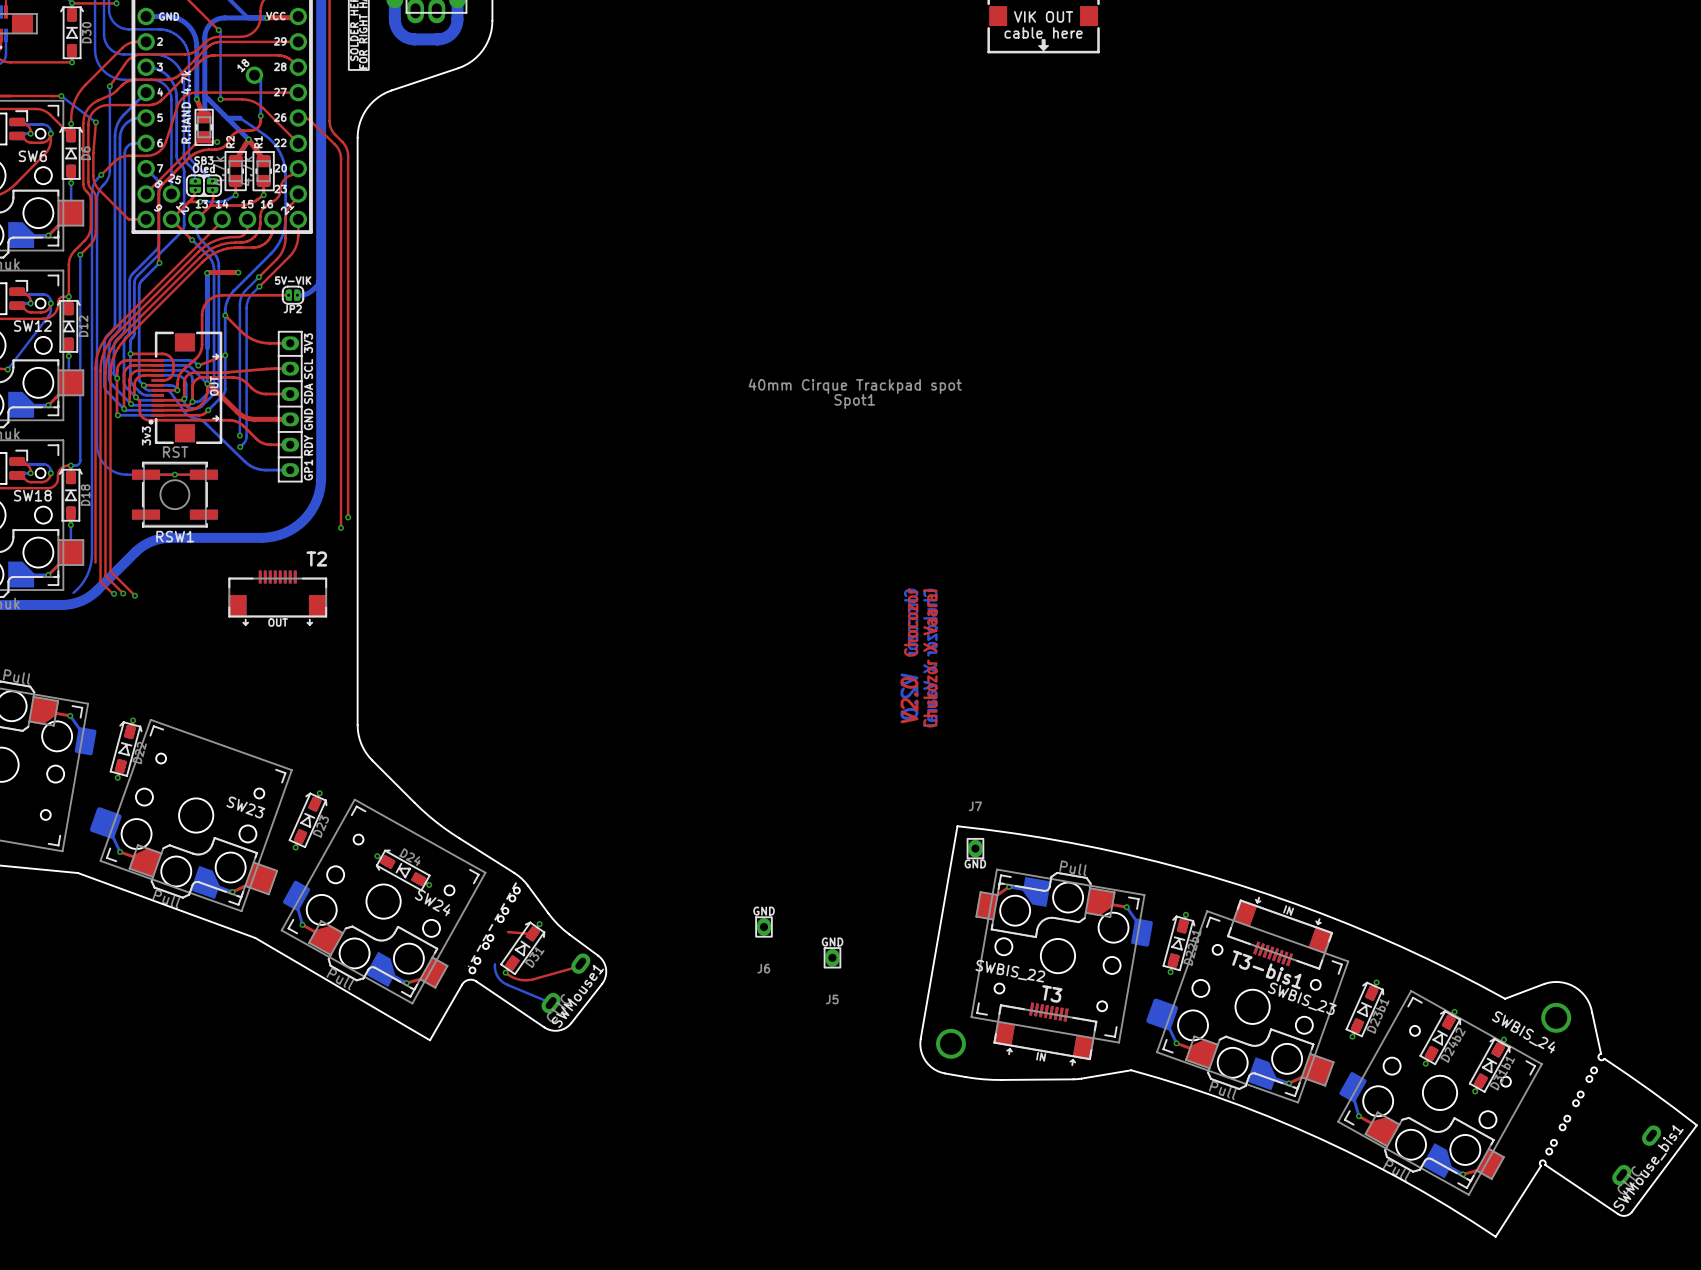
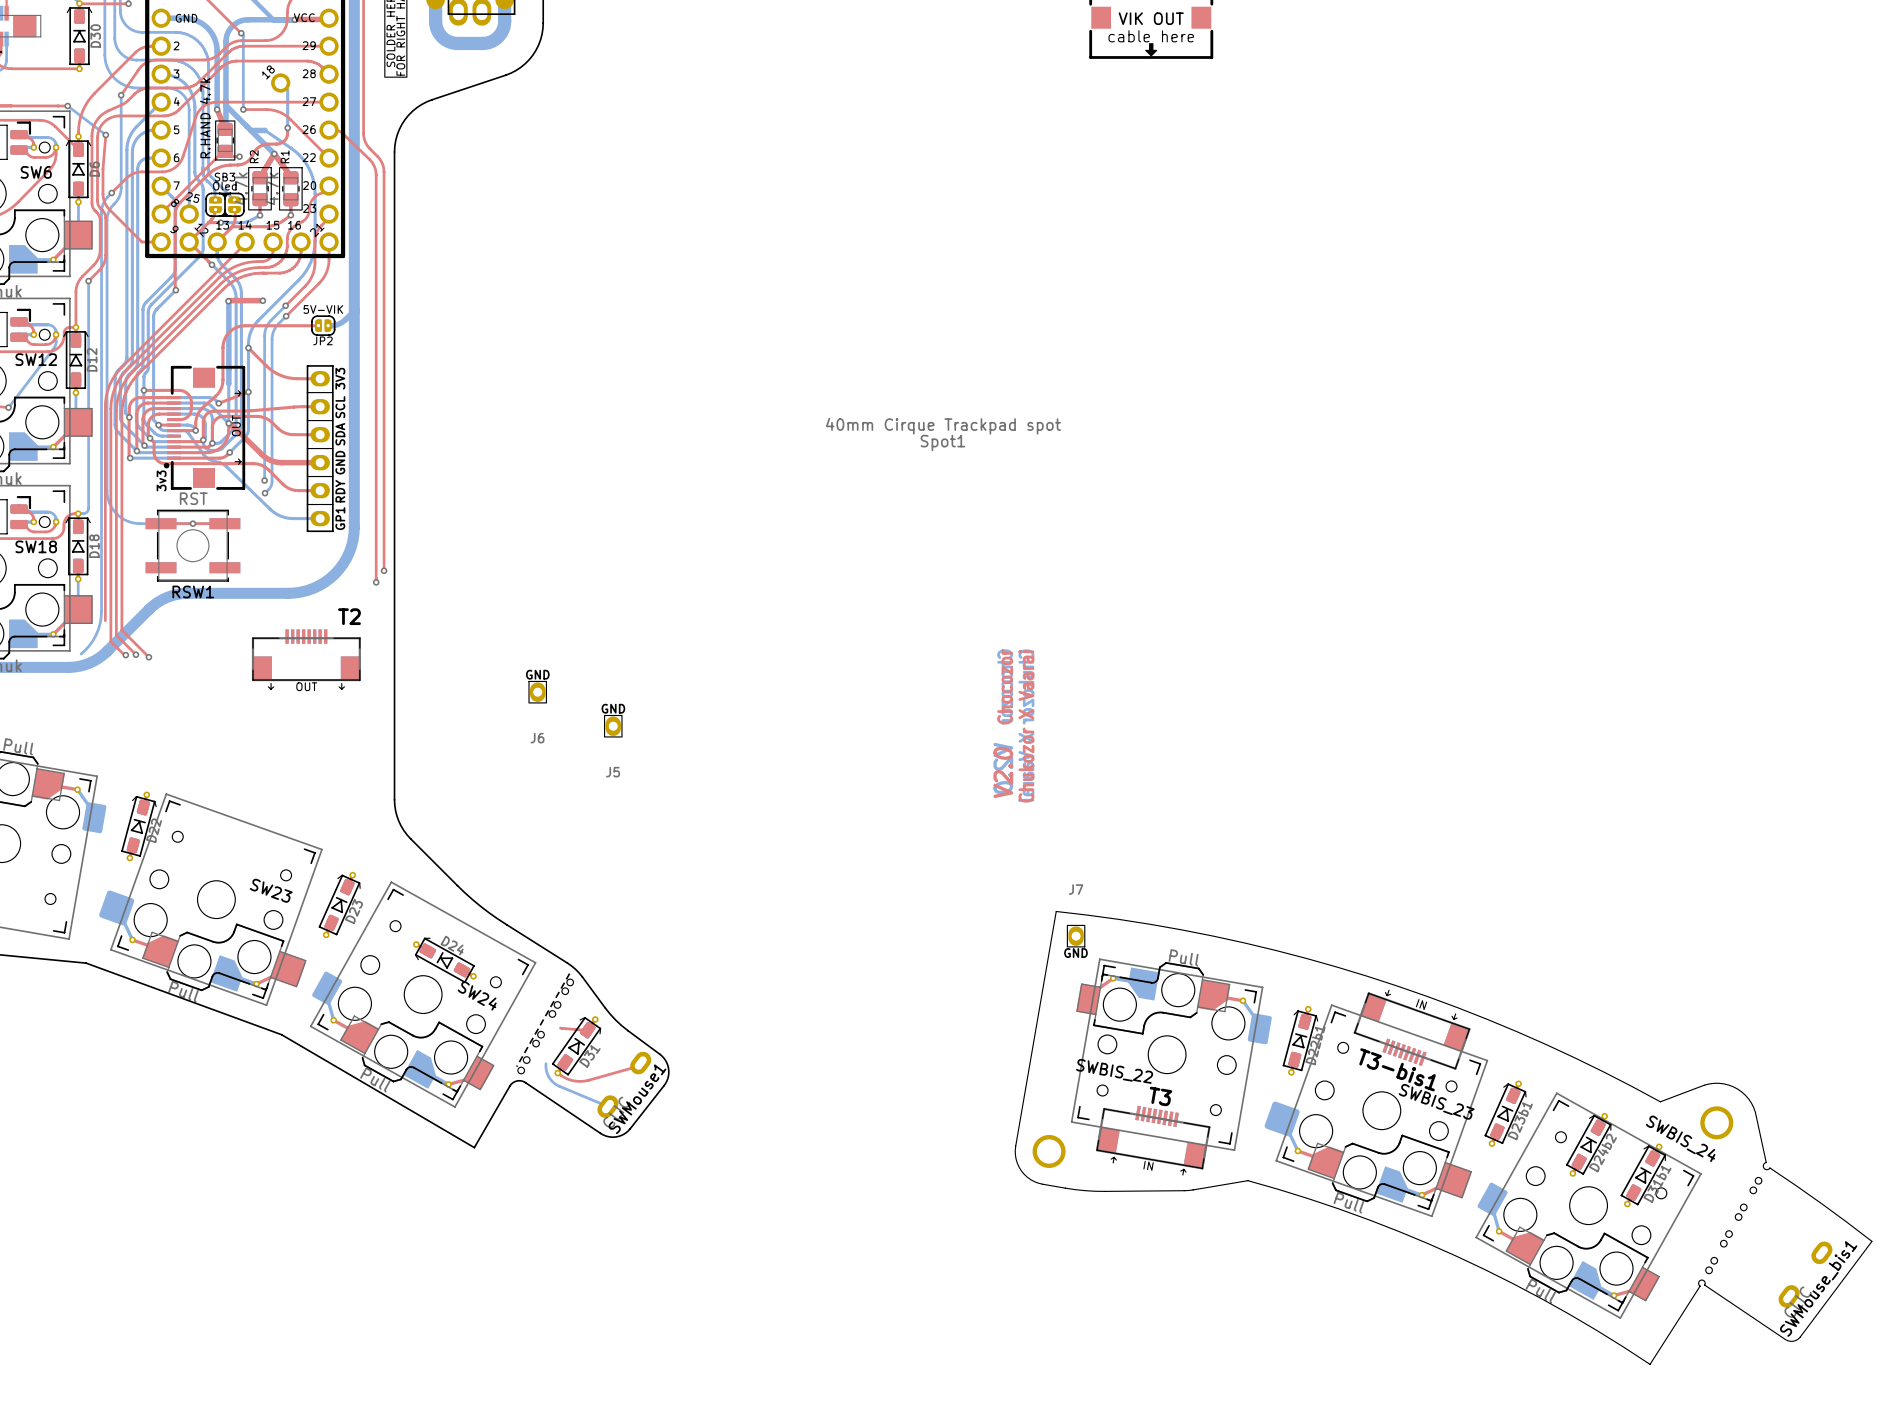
J6 position: (763, 926) -> (537, 692)
J5 position: (832, 957) -> (613, 726)

